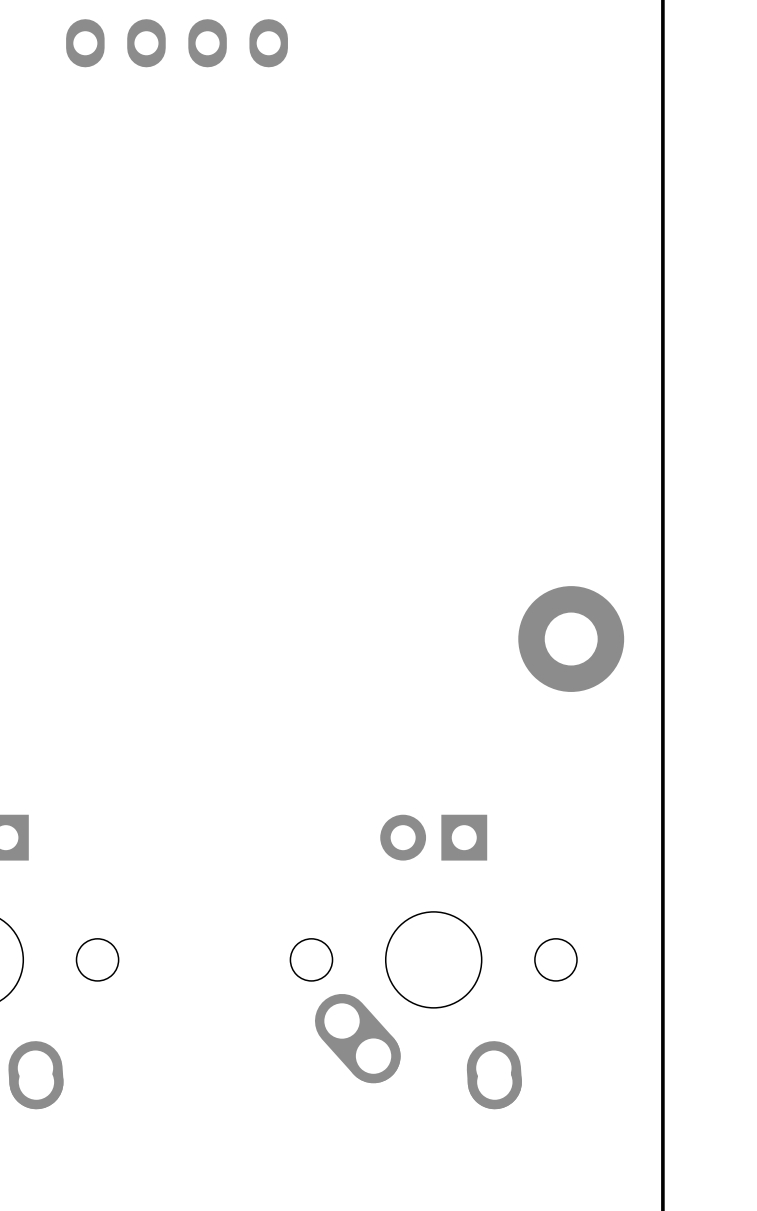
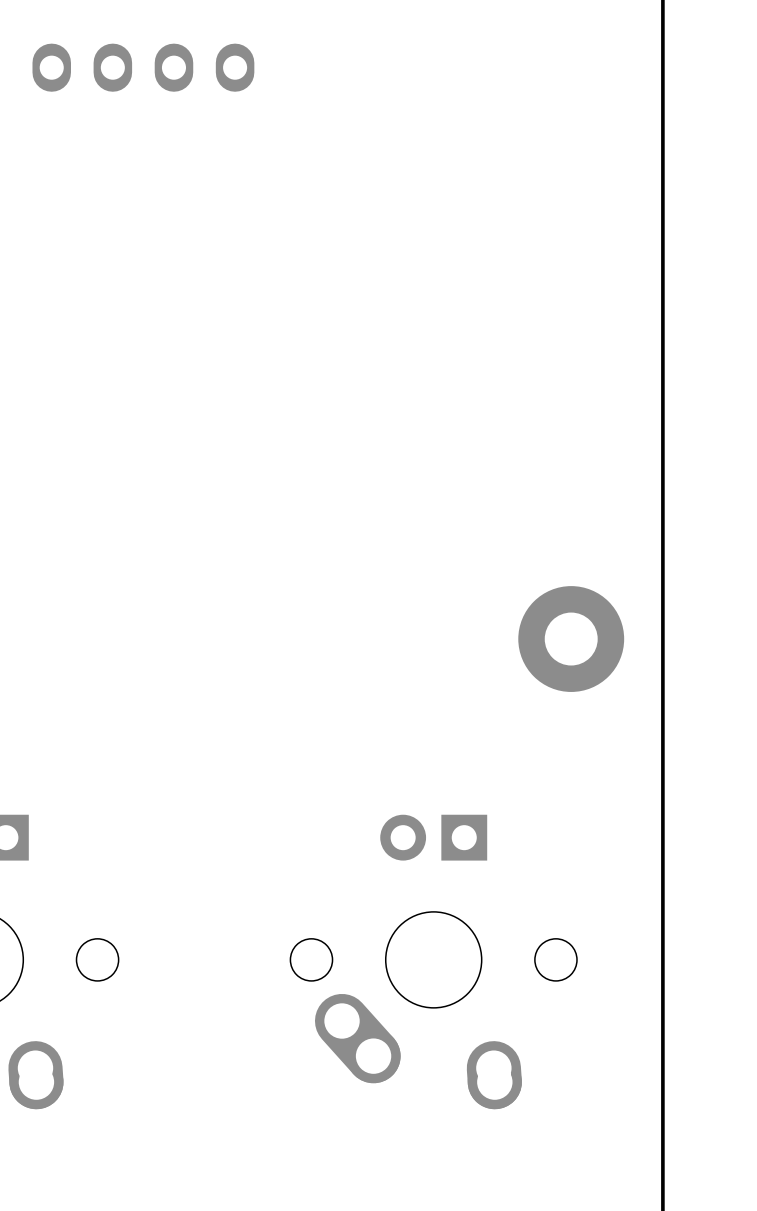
part position: (177, 43) -> (143, 67)

